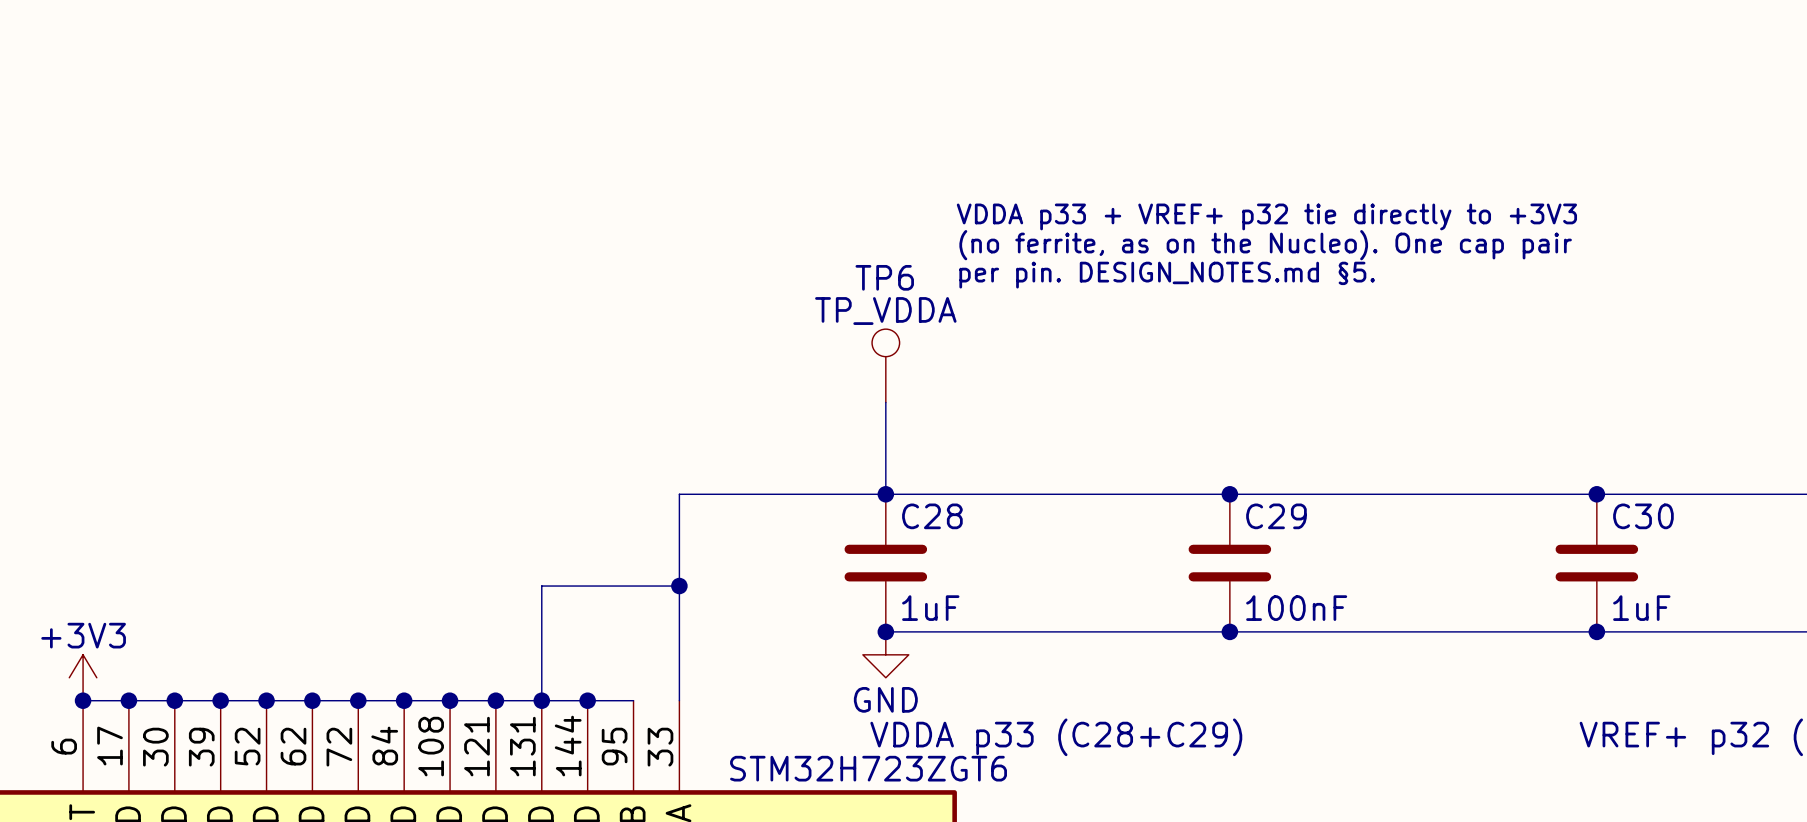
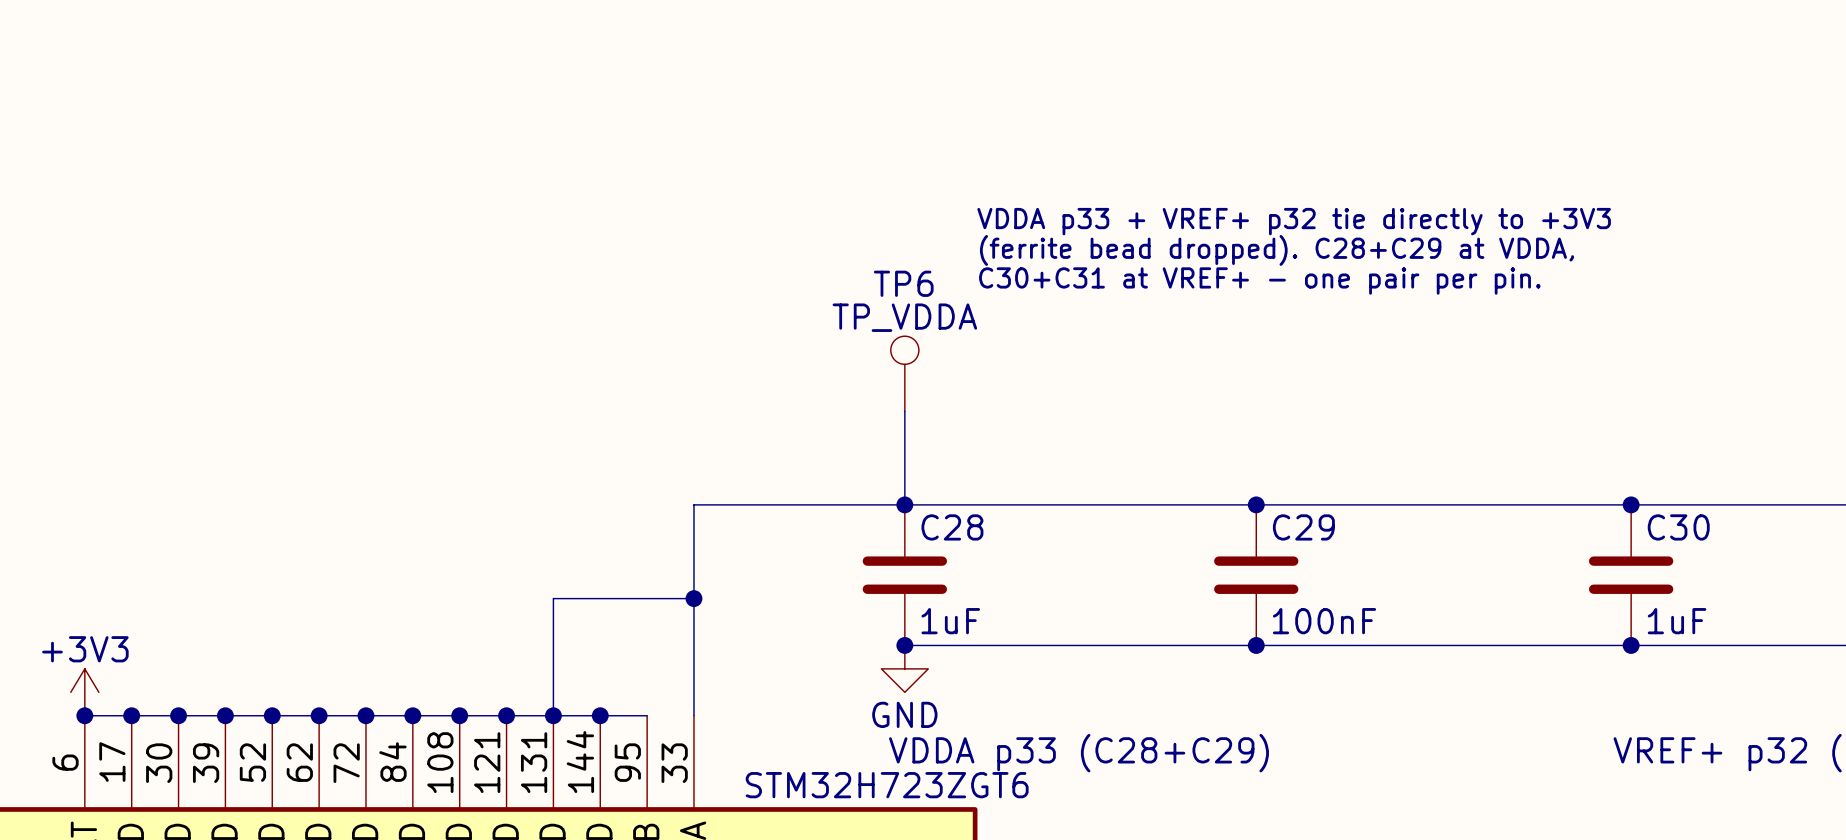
text: (no ferrite, as on the Nucleo). One cap pair (1265, 245) -> (ferrite bead dropped). C28+C29 at VDDA, (1276, 250)
text: per pin. DESIGN_NOTES.md §5. (1167, 275) -> C30+C31 at VREF+ - one pair per pin. (1259, 281)

